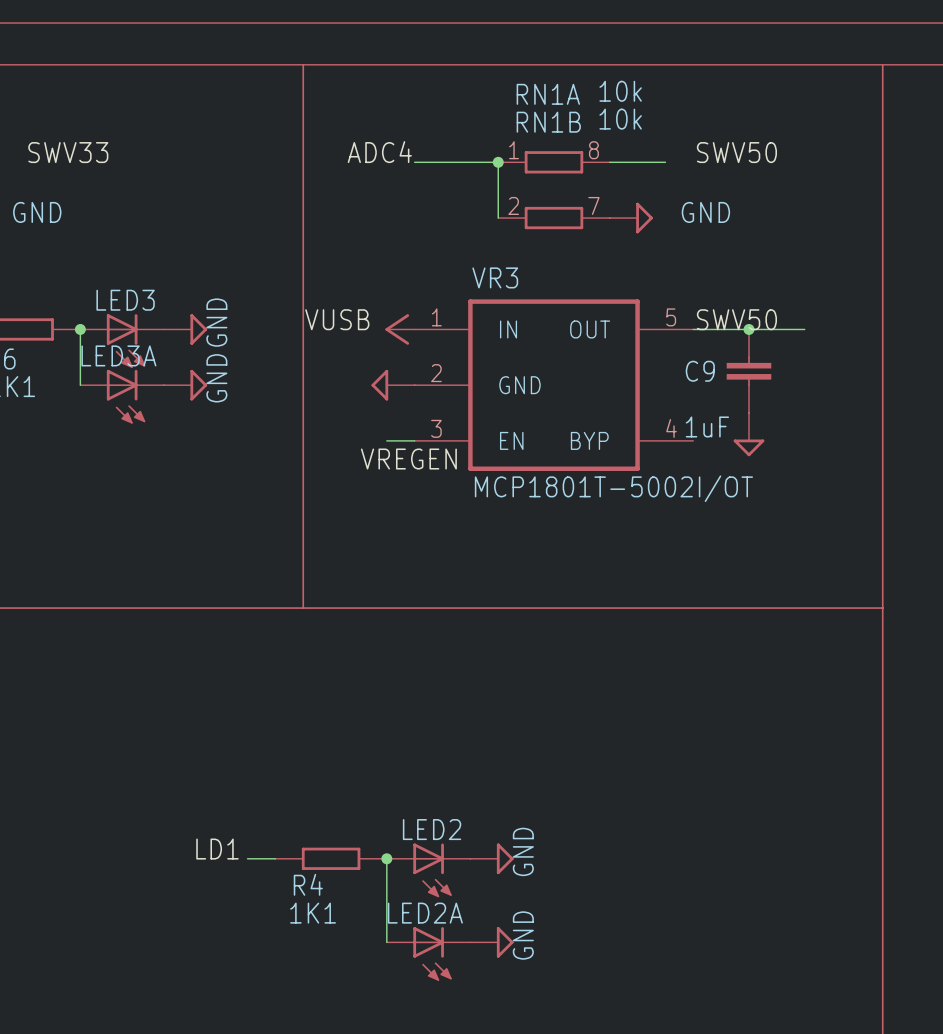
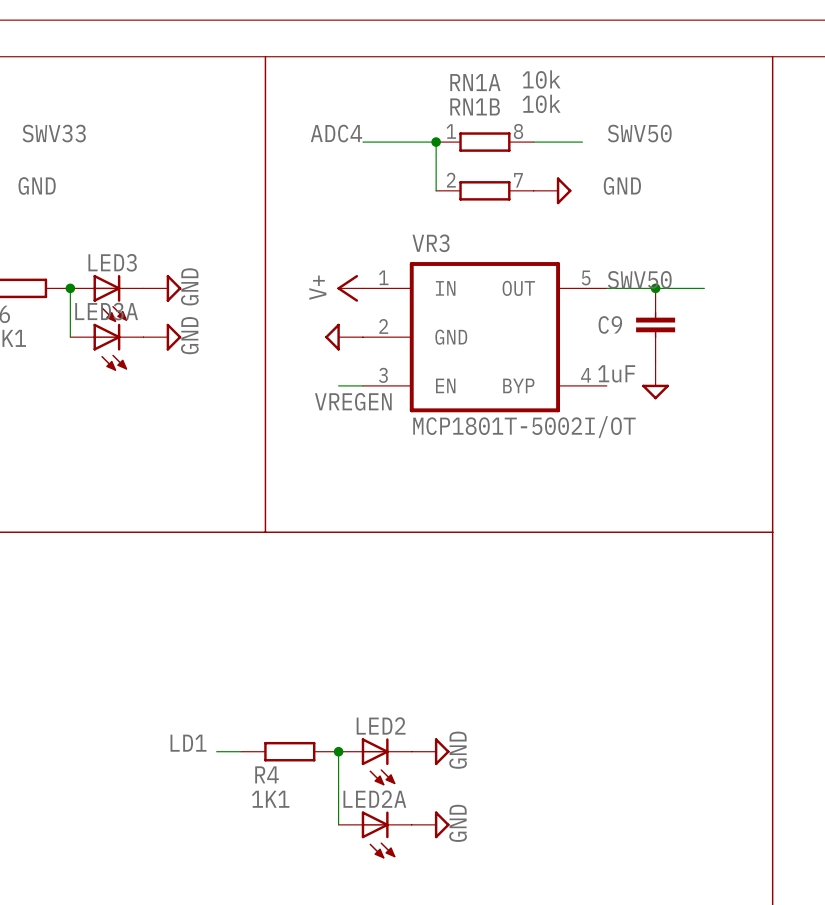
label: VUSB (337, 319) -> none
power symbol text: none -> V+ (317, 287)

